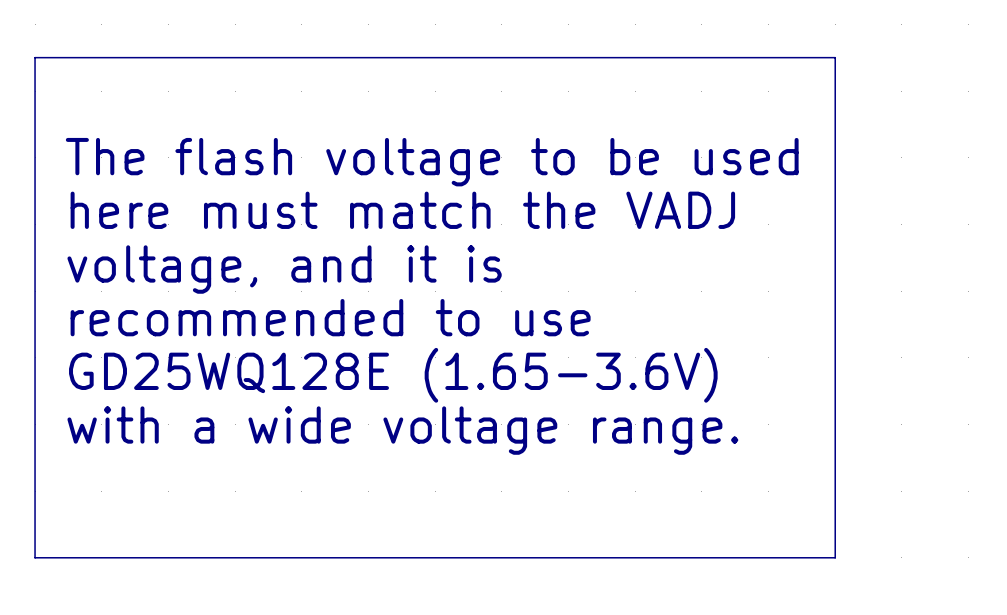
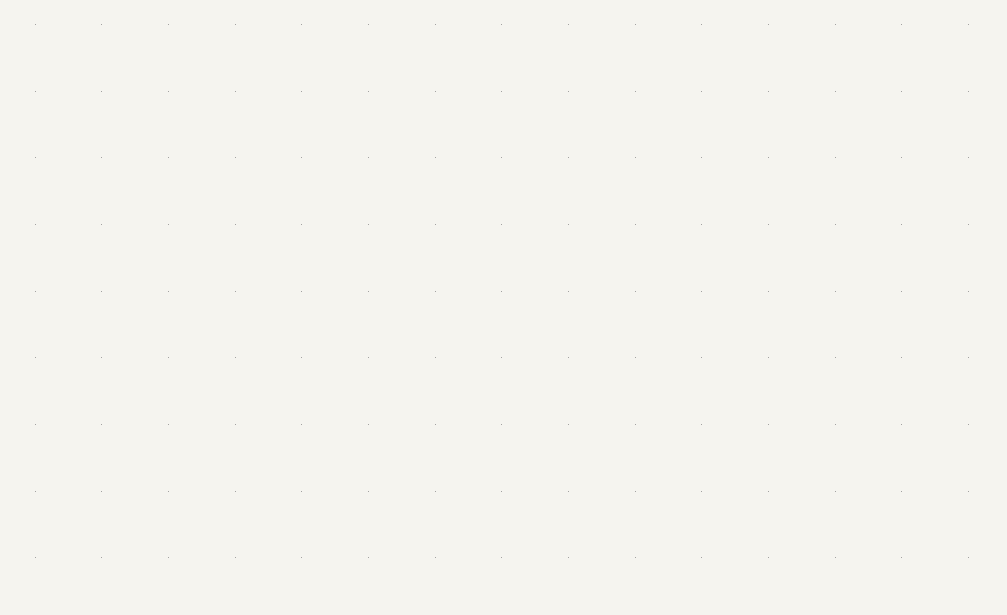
line: (35, 57) (835, 57) (835, 557) (35, 557) (35, 57) -> none
text: The flash voltage to be used (432, 162) -> none
text: here must match the VADJ (402, 210) -> none
text: voltage, and it is (284, 269) -> none
text: recommended to use (330, 317) -> none
text: GD25WQ128E (1.65-3.6V) (393, 375) -> none
text: with a wide voltage range. (402, 430) -> none

